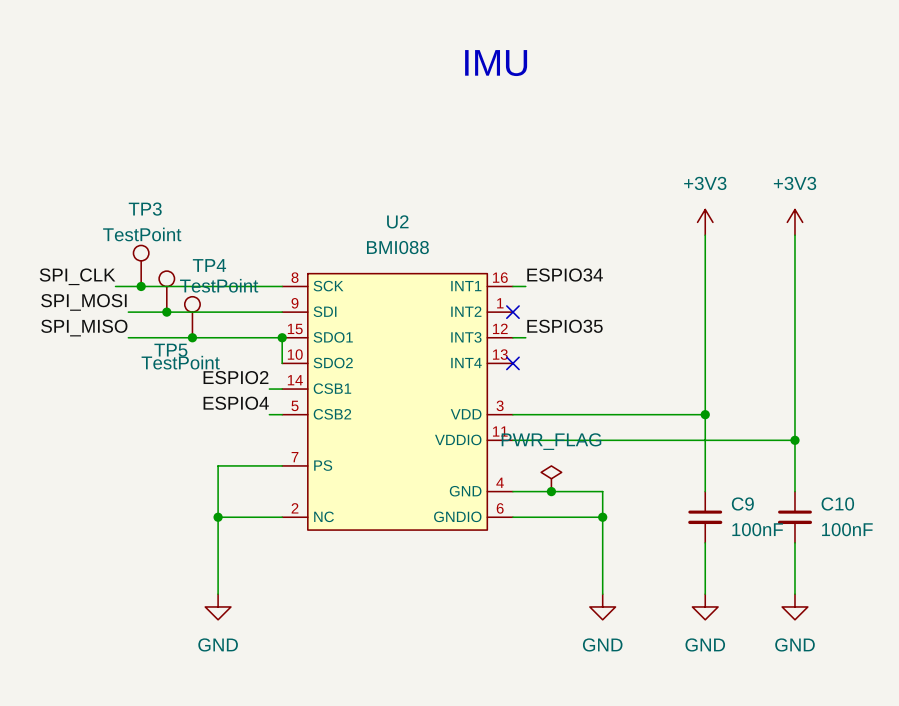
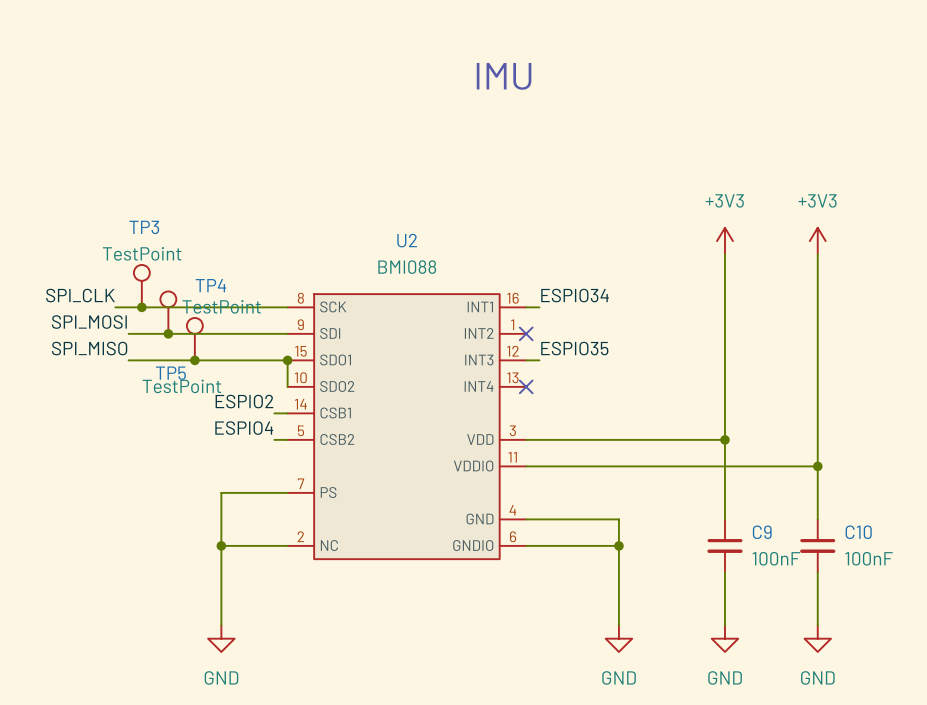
power symbol: PWR_FLAG (551, 478) -> none
junction: (551, 491) -> none

